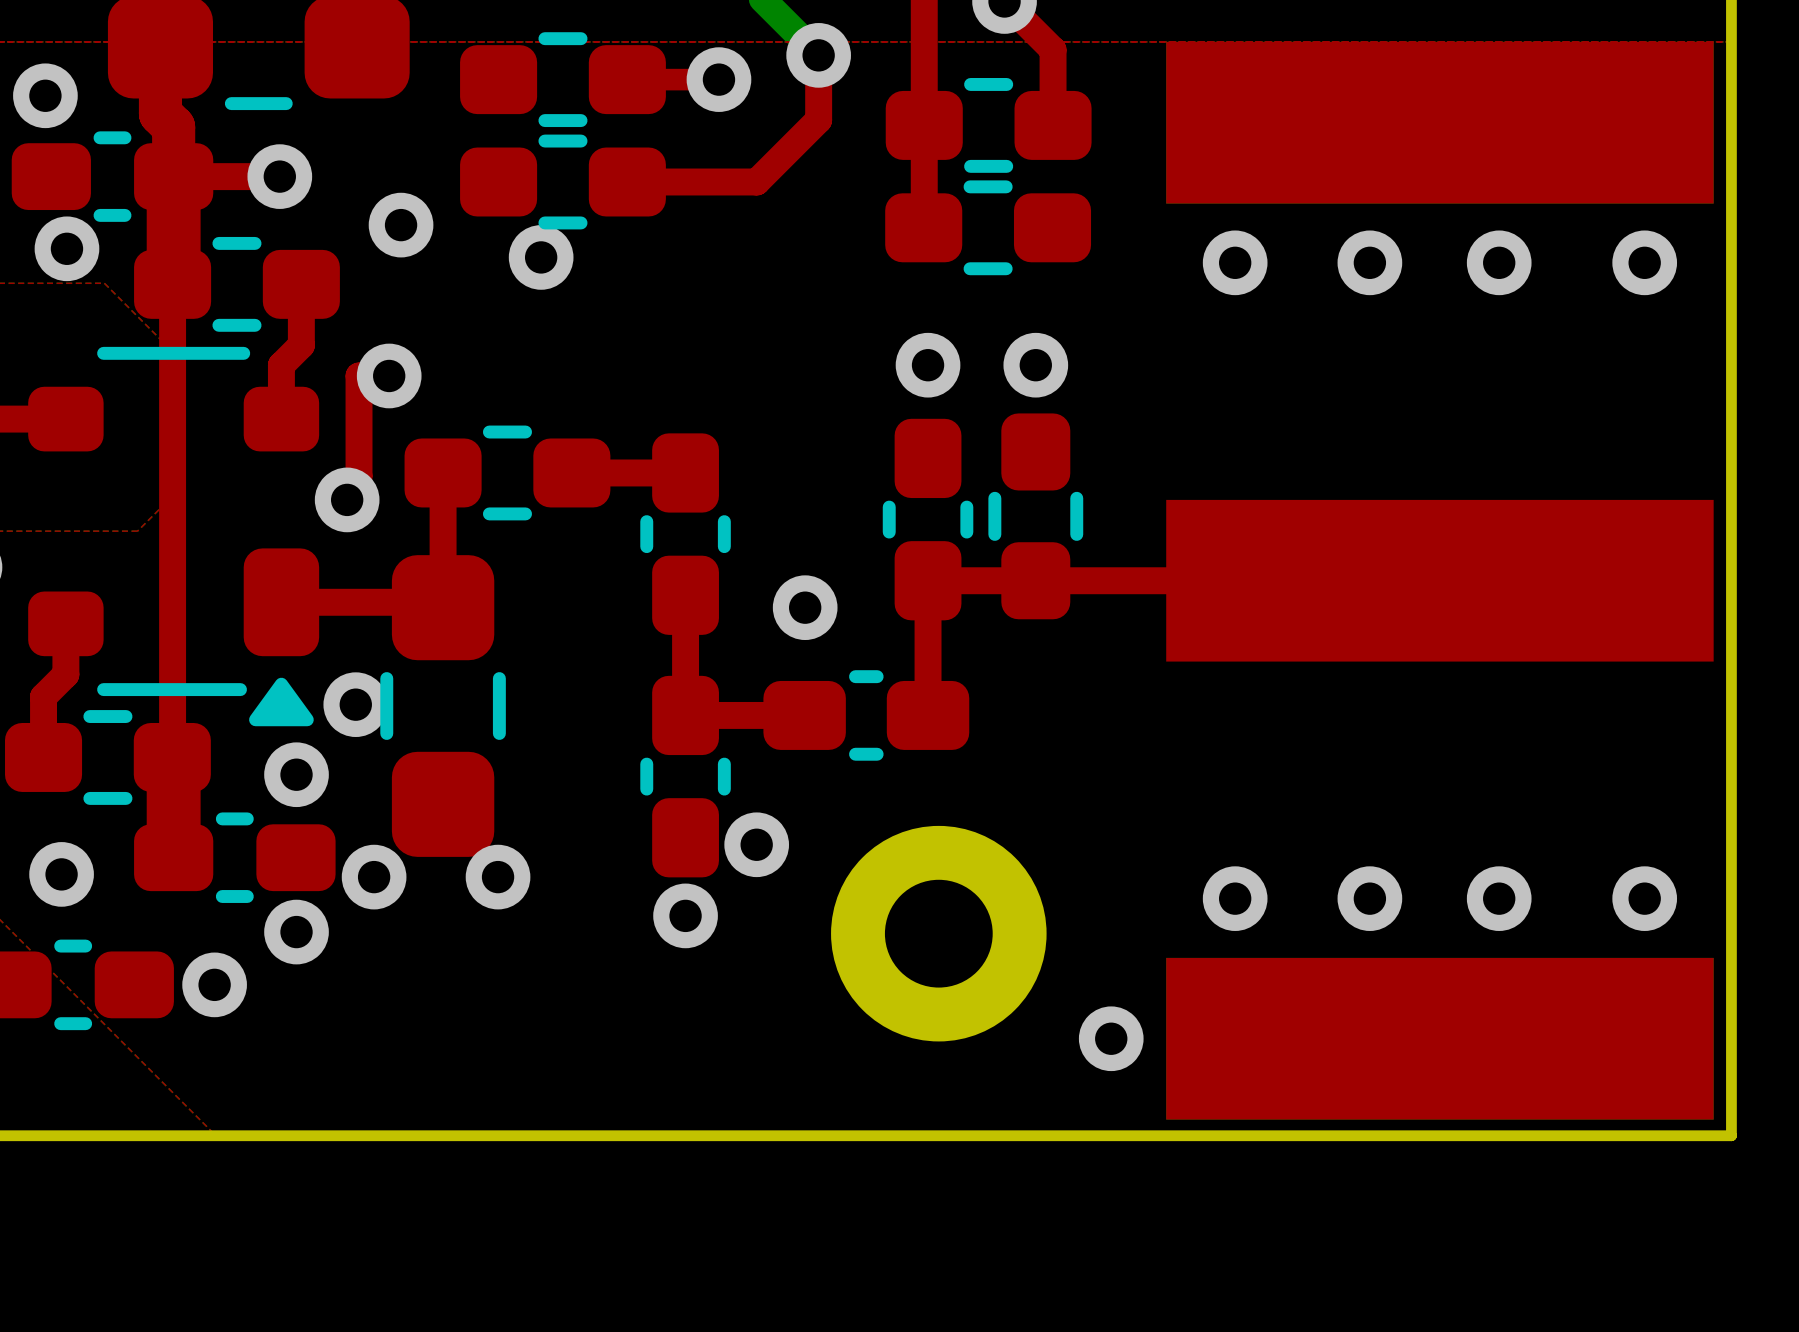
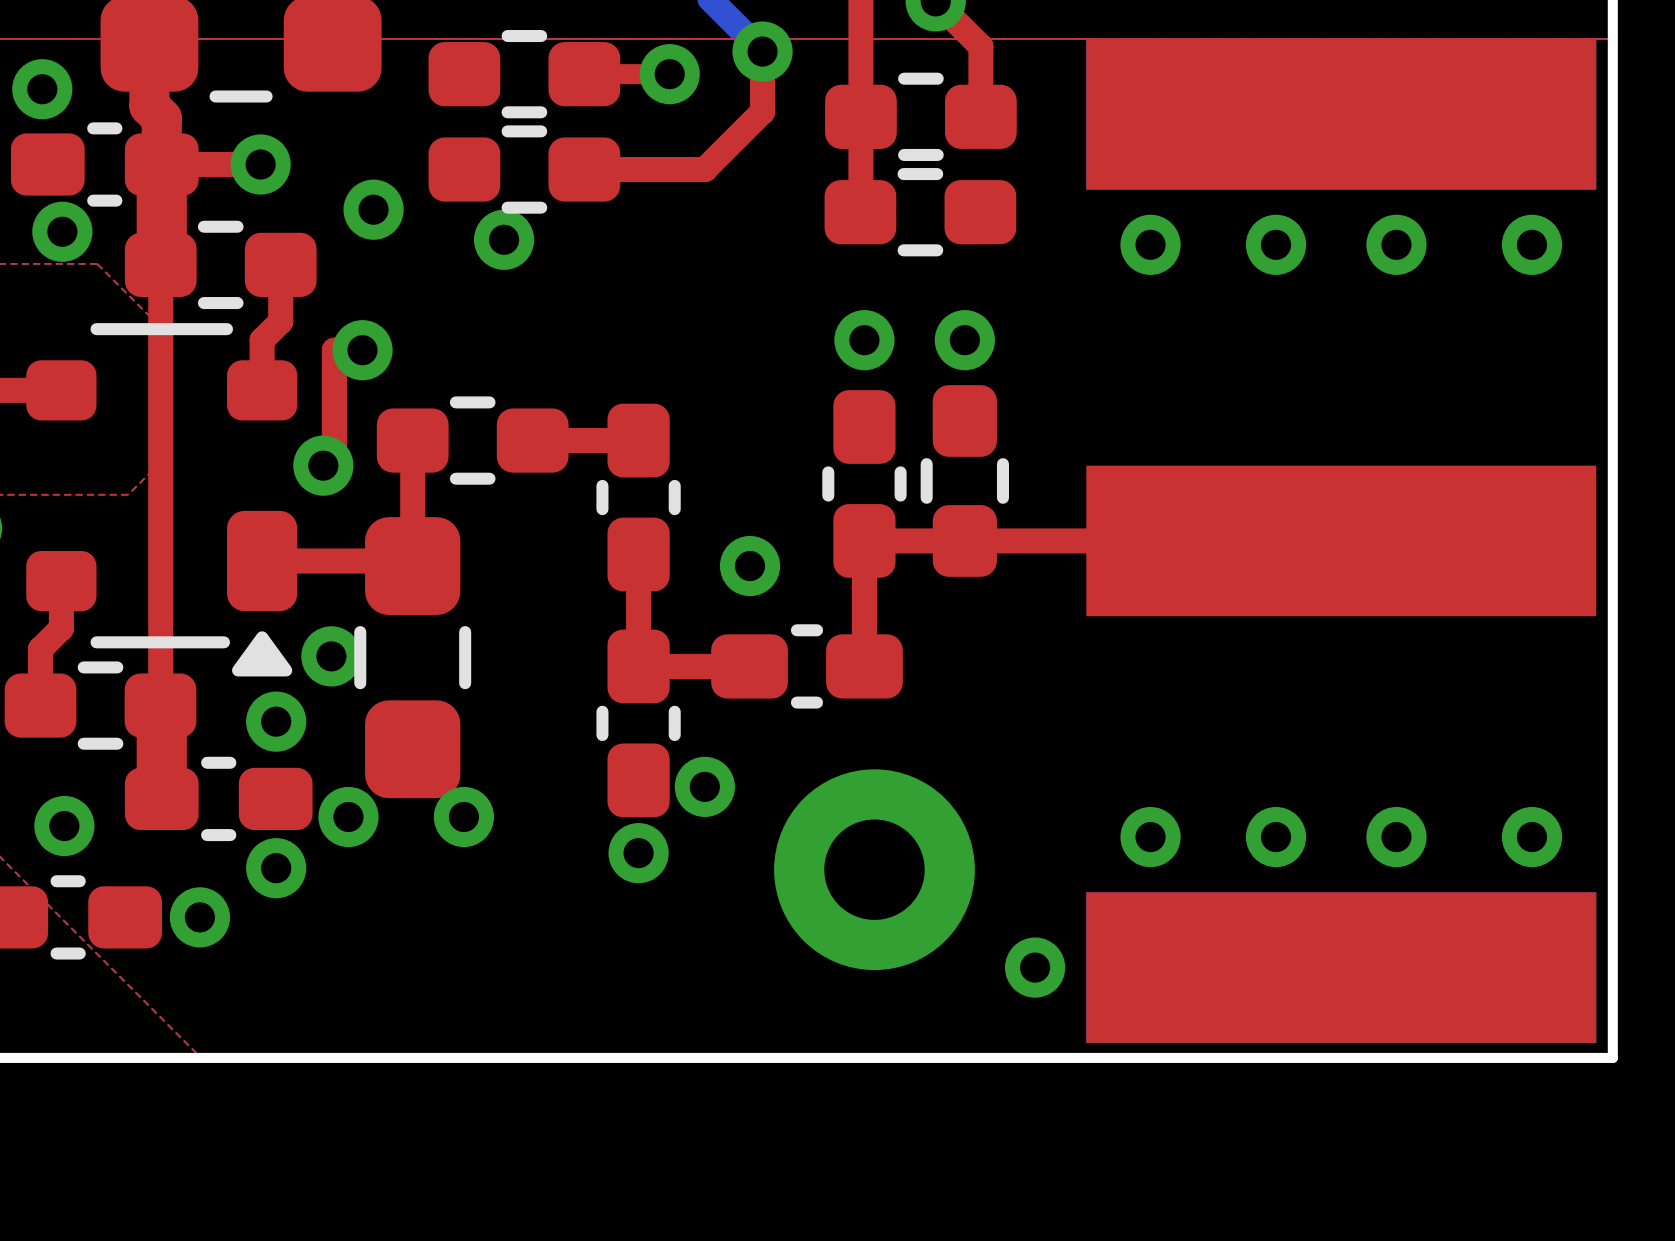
via position: (61, 874) -> (64, 826)

